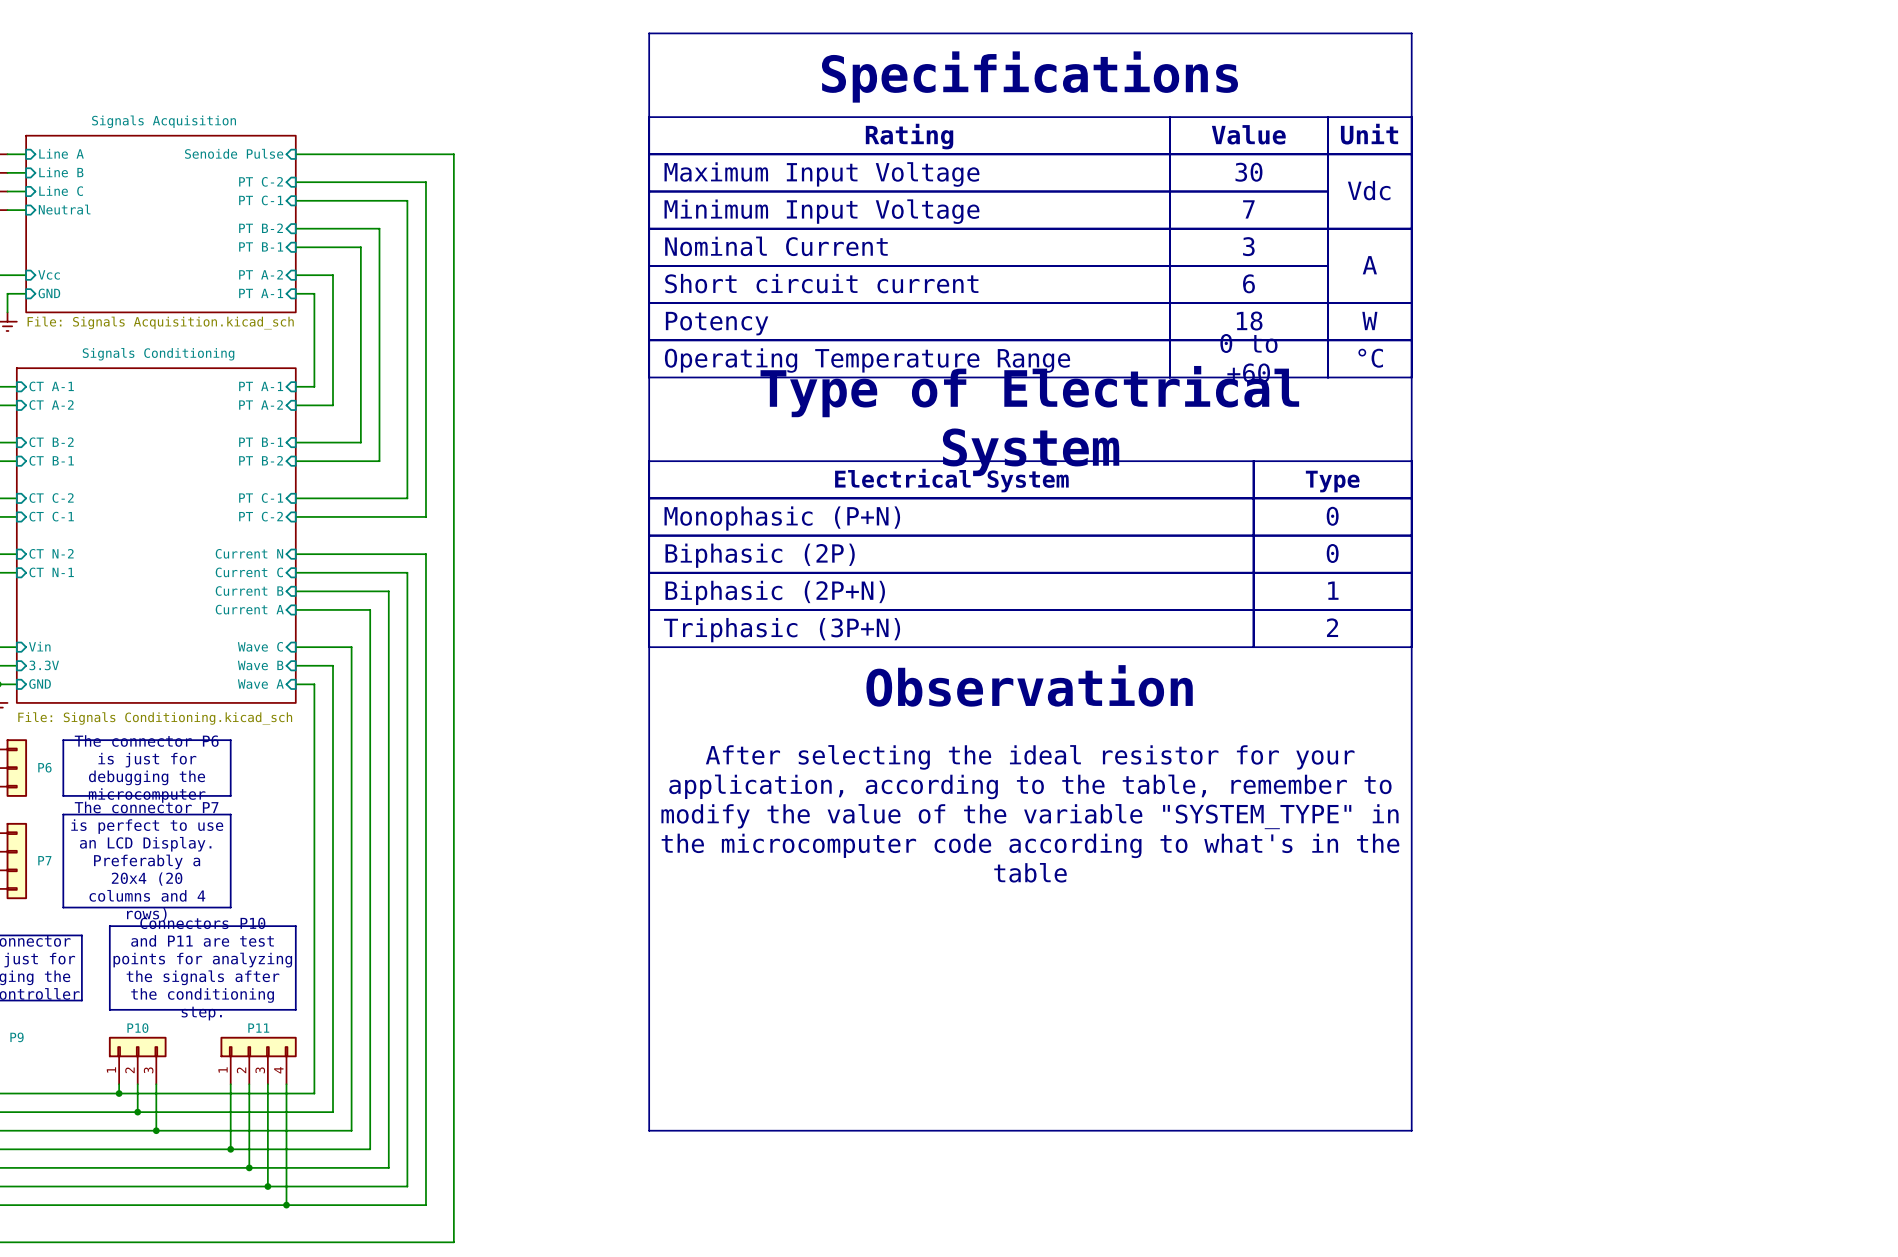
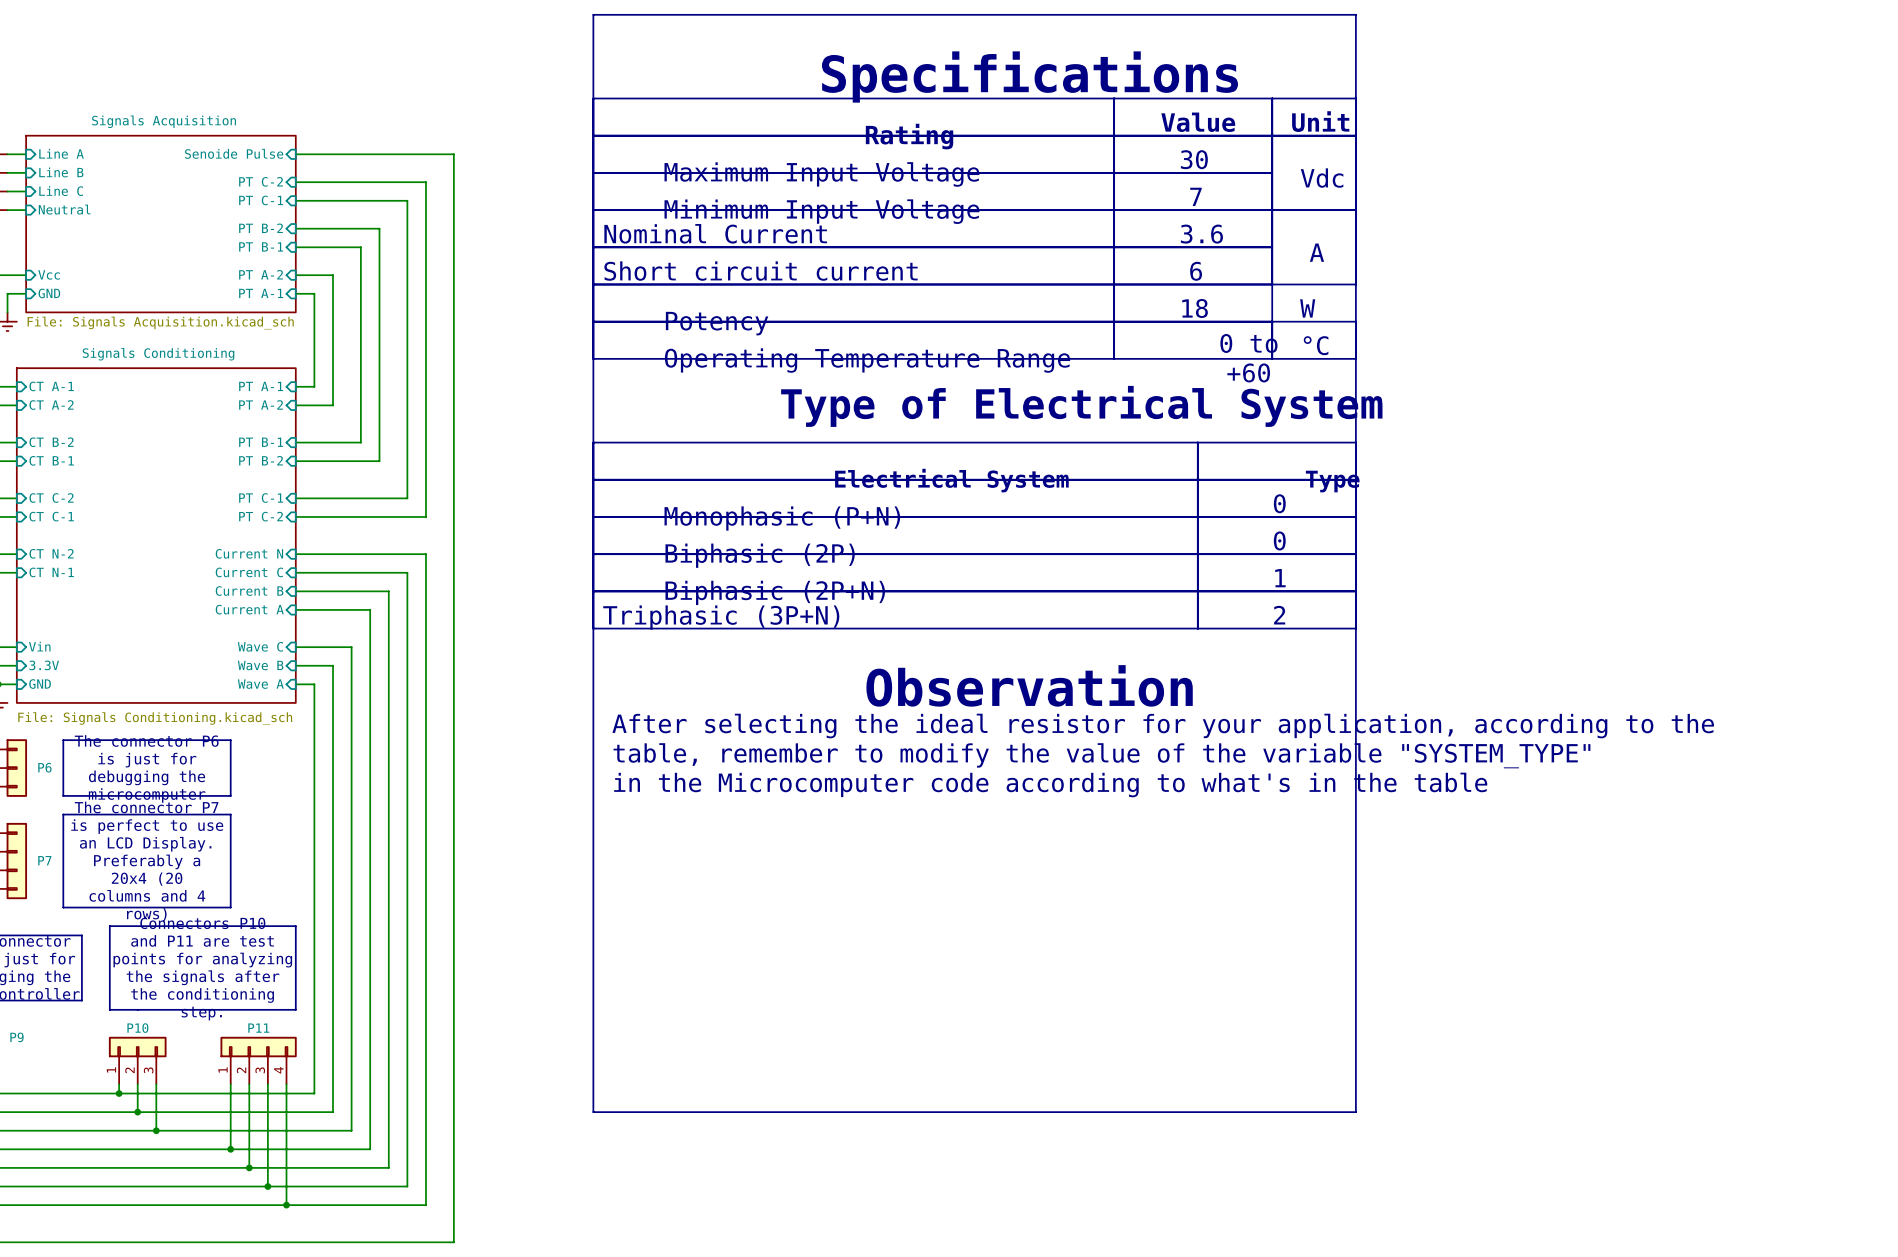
line: (649, 33) (1411, 33) (1411, 1130) (649, 1130) (649, 33) -> (593, 14) (1355, 14) (1355, 1112) (593, 1112) (593, 14)
line: (649, 117) (1411, 117) -> (593, 98) (1355, 98)
line: (1169, 117) (1169, 377) -> (1114, 98) (1114, 358)
line: (1328, 117) (1328, 377) -> (1272, 98) (1272, 358)
text position: Value (1248, 134) -> Value (1198, 122)
text position: Unit (1369, 134) -> Unit (1320, 121)
line: (649, 154) (1411, 154) -> (593, 135) (1355, 135)
text position: 30 (1248, 172) -> 30 (1194, 159)
text position: Vdc (1369, 190) -> Vdc (1322, 178)
line: (649, 191) (1328, 191) -> (593, 172) (1272, 172)
text position: 7 (1248, 209) -> 7 (1195, 196)
line: (649, 228) (1411, 228) -> (593, 210) (1355, 210)
text: none -> 3.6 (1201, 234)
text position: Nominal Current (776, 246) -> Nominal Current (715, 233)
text: 3 (1248, 246) -> none
line: (649, 265) (1328, 265) -> (593, 247) (1272, 247)
text position: A (1369, 265) -> A (1316, 252)
text position: Short circuit current (821, 283) -> Short circuit current (761, 271)
text position: 6 (1248, 283) -> 6 (1196, 271)
line: (649, 303) (1411, 303) -> (593, 284) (1355, 284)
text position: 18 (1249, 321) -> 18 (1195, 308)
text position: W (1369, 321) -> W (1307, 308)
line: (649, 340) (1411, 340) -> (593, 321) (1355, 321)
text position: °C (1370, 358) -> °C (1316, 345)
line: (649, 377) (1411, 377) -> (593, 358) (1355, 358)
text: Type of Electrical (1029, 391) -> none
text: none -> Type of Electrical System (1081, 406)
text: System (1031, 452) -> none
line: (649, 461) (1411, 461) -> (593, 442) (1355, 442)
line: (1253, 461) (1253, 647) -> (1197, 442) (1197, 628)
line: (649, 498) (1411, 498) -> (593, 479) (1355, 479)
text: none -> 0 (1279, 503)
text: 0 (1332, 516) -> none
line: (649, 535) (1411, 535) -> (593, 516) (1355, 516)
text: none -> 0 (1279, 540)
text: 0 (1332, 553) -> none
line: (649, 572) (1411, 572) -> (593, 554) (1355, 554)
text position: 1 (1333, 590) -> 1 (1280, 578)
line: (649, 609) (1411, 609) -> (593, 591) (1355, 591)
text position: 2 (1332, 627) -> 2 (1279, 615)
text position: Triphasic (3P+N) (782, 630) -> Triphasic (3P+N) (721, 617)
line: (649, 647) (1411, 647) -> (593, 628) (1355, 628)
text: none -> After selecting the ideal resistor for your application, according to the (1163, 726)
text: none -> table, remember to modify the value of the variable "SYSTEM_TYPE" (1101, 755)
text: After selecting the ideal resistor for your (1030, 757) -> none
text: none -> in the Microcomputer code according to what's in the table (1050, 784)
text: application, according to the table, remember to (1030, 786) -> none
text: modify the value of the variable "SYSTEM_TYPE" in (1029, 816) -> none
text: the microcomputer code according to what's in the (1030, 845) -> none
text: table (1030, 872) -> none

